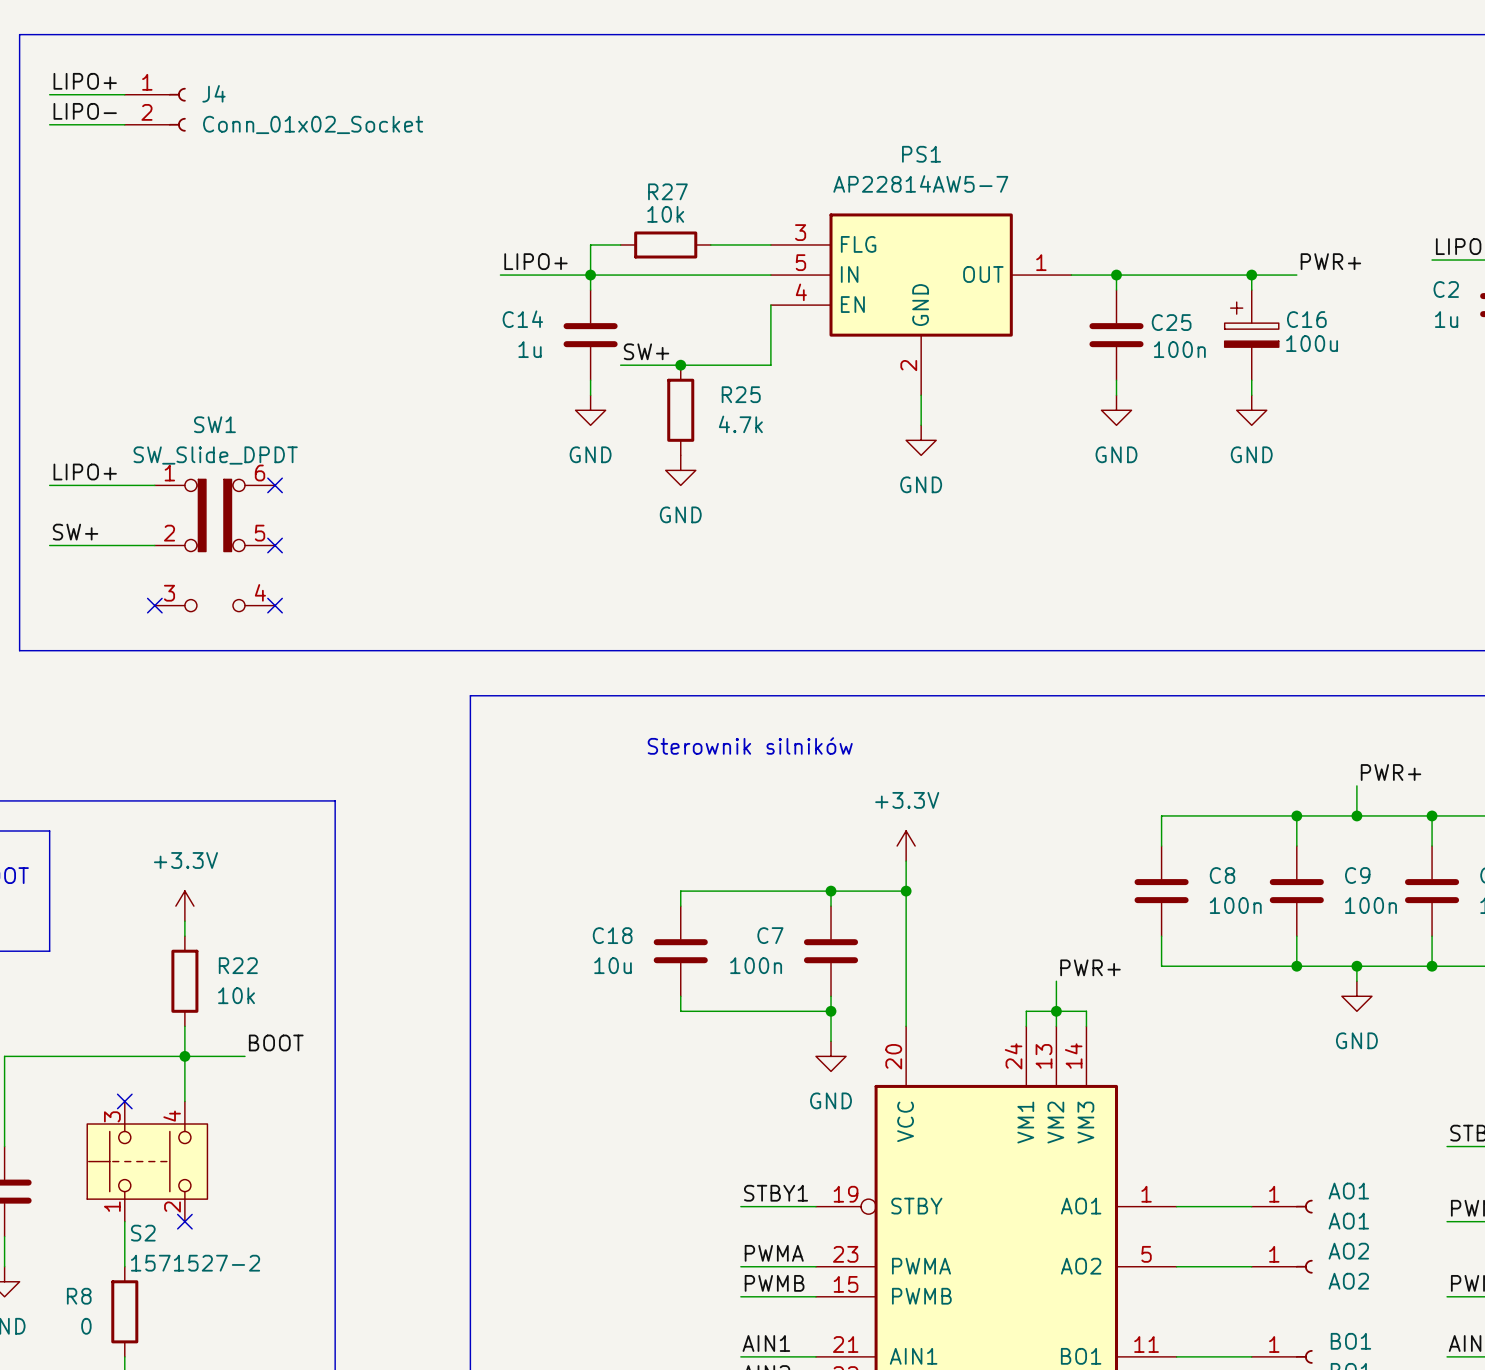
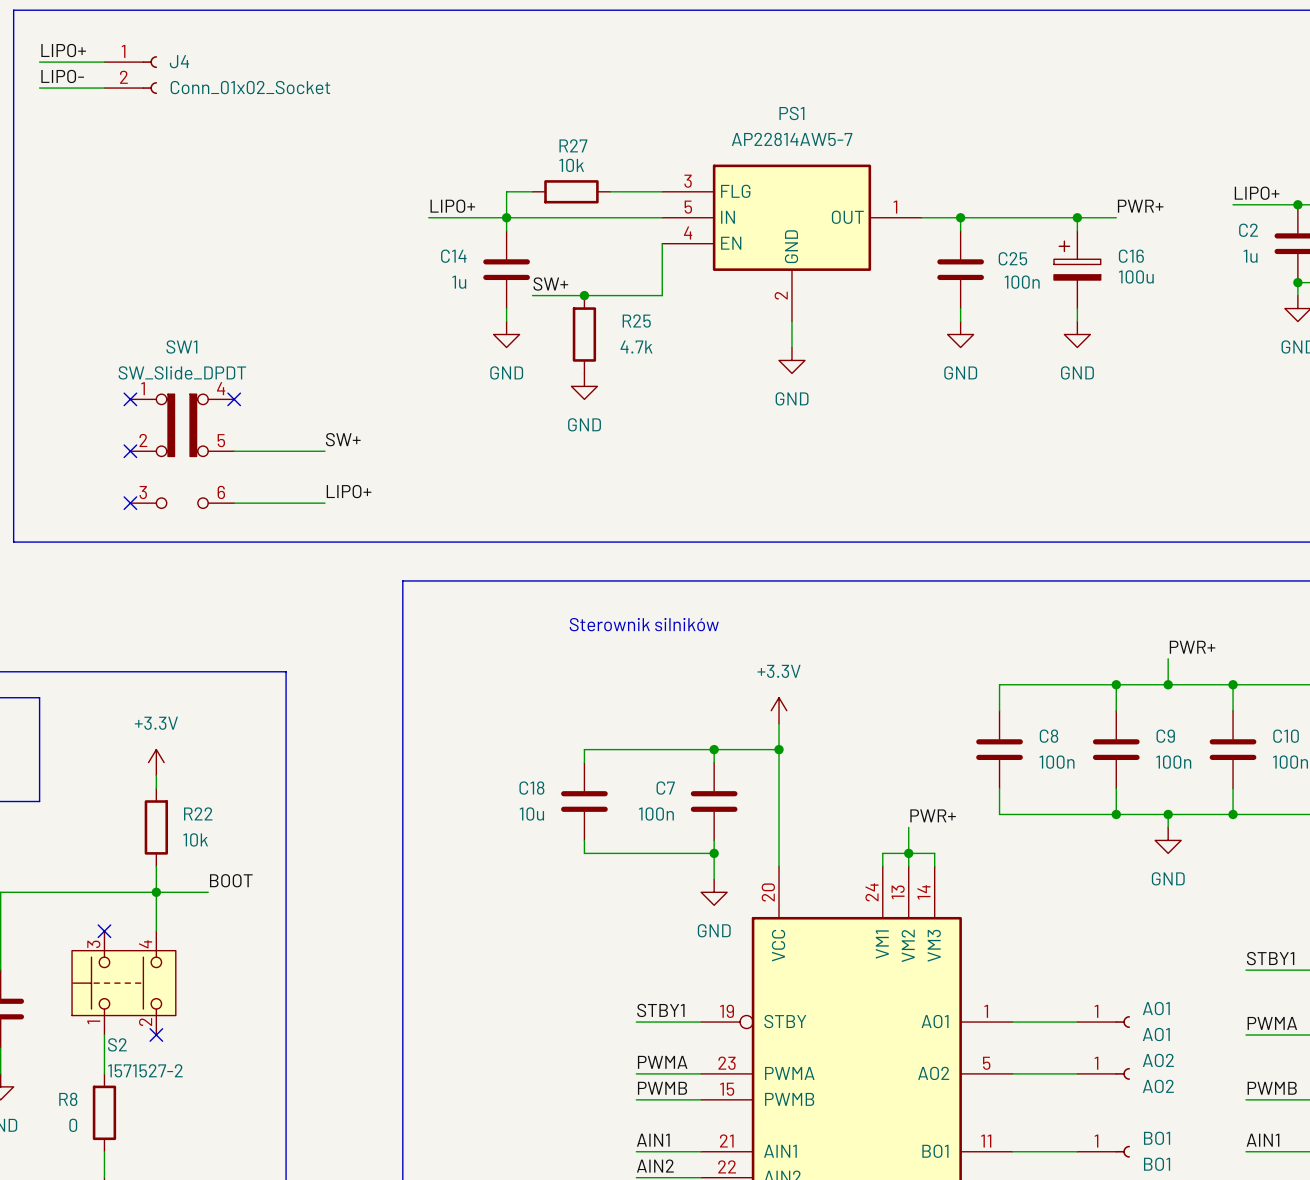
label: LIPO+ (85, 471) -> none
SW1 pin number: 6 (260, 473) -> 4 (221, 388)
wire: (49, 485) (154, 485) -> (234, 503) (324, 503)
no-connect mark: none -> (130, 399)
label: SW+ (75, 532) -> none
label: none -> SW+ (343, 439)
wire: (49, 545) (154, 545) -> (234, 451) (324, 451)
no-connect mark: none -> (130, 451)
no-connect mark: (275, 545) -> none
SW1 pin number: 4 (260, 592) -> 6 (221, 492)
label: none -> LIPO+ (349, 491)
no-connect mark: (275, 605) -> none

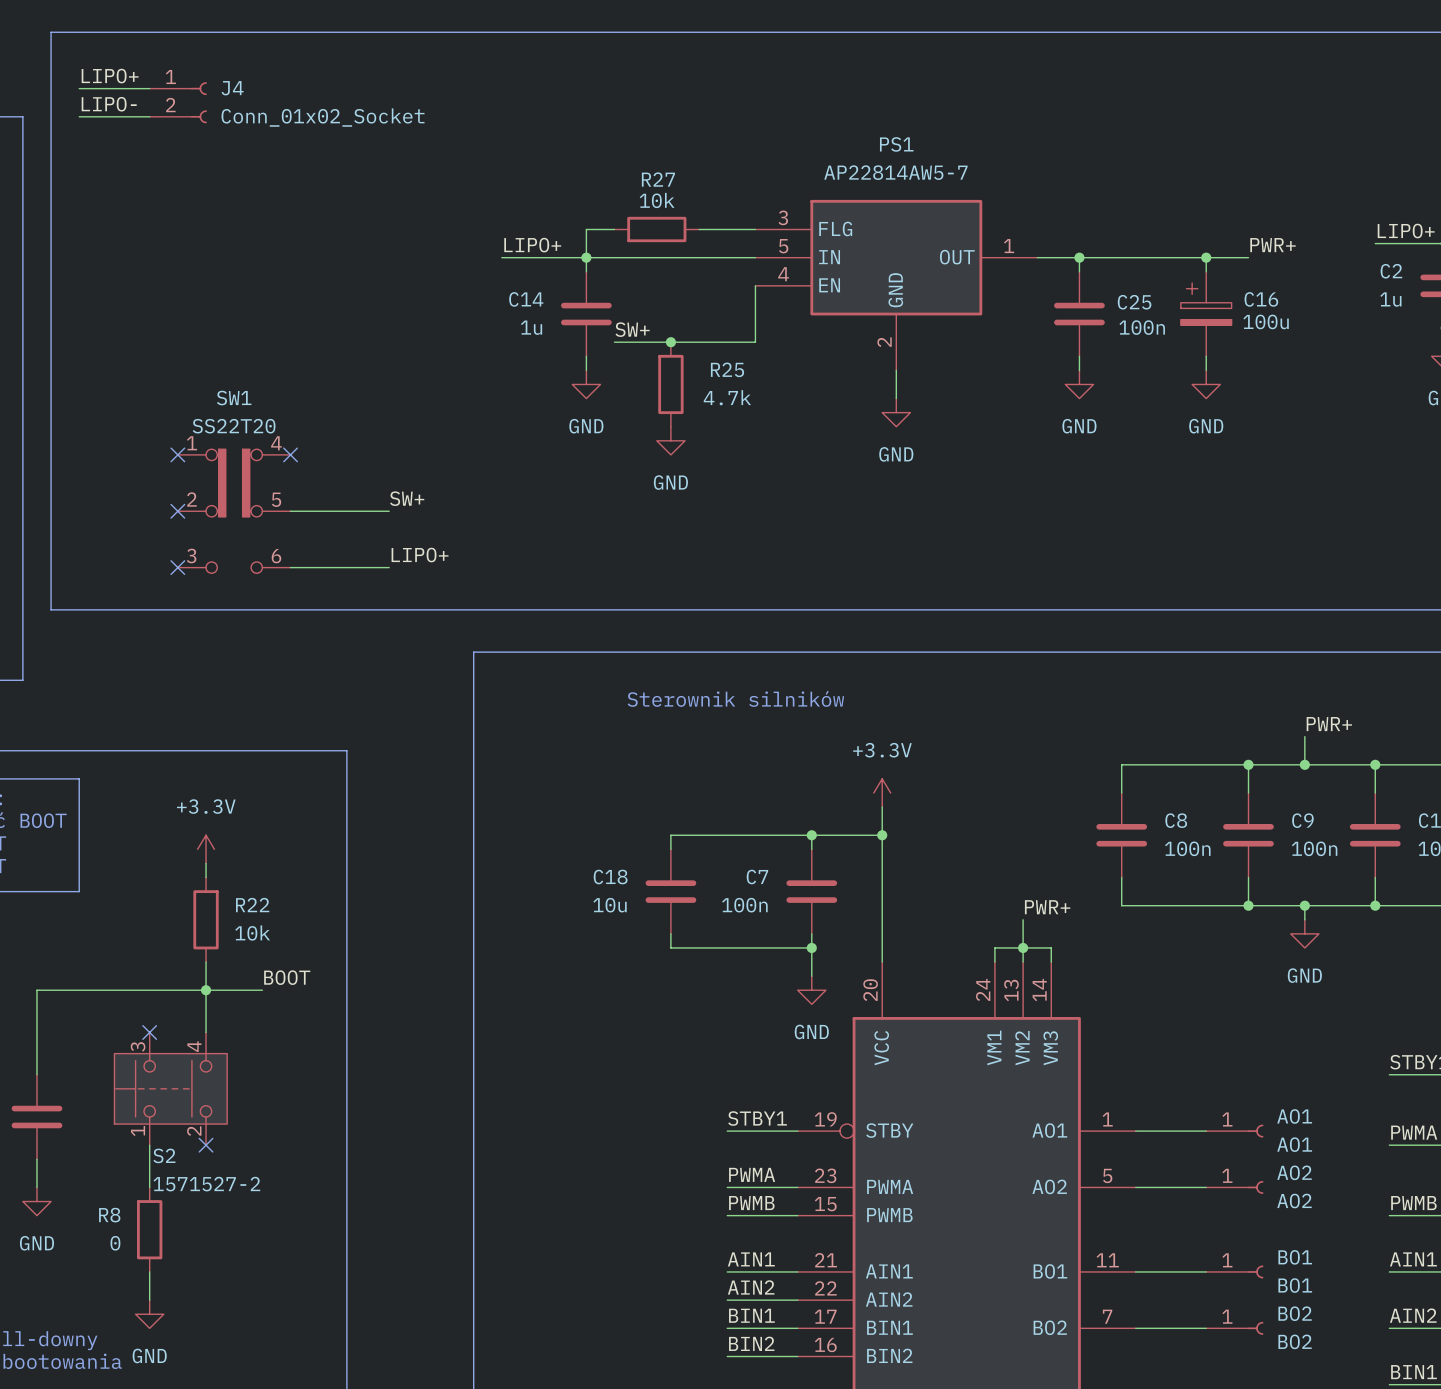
SW1 value: SW_Slide_DPDT (182, 372) -> SS22T20 (234, 426)

